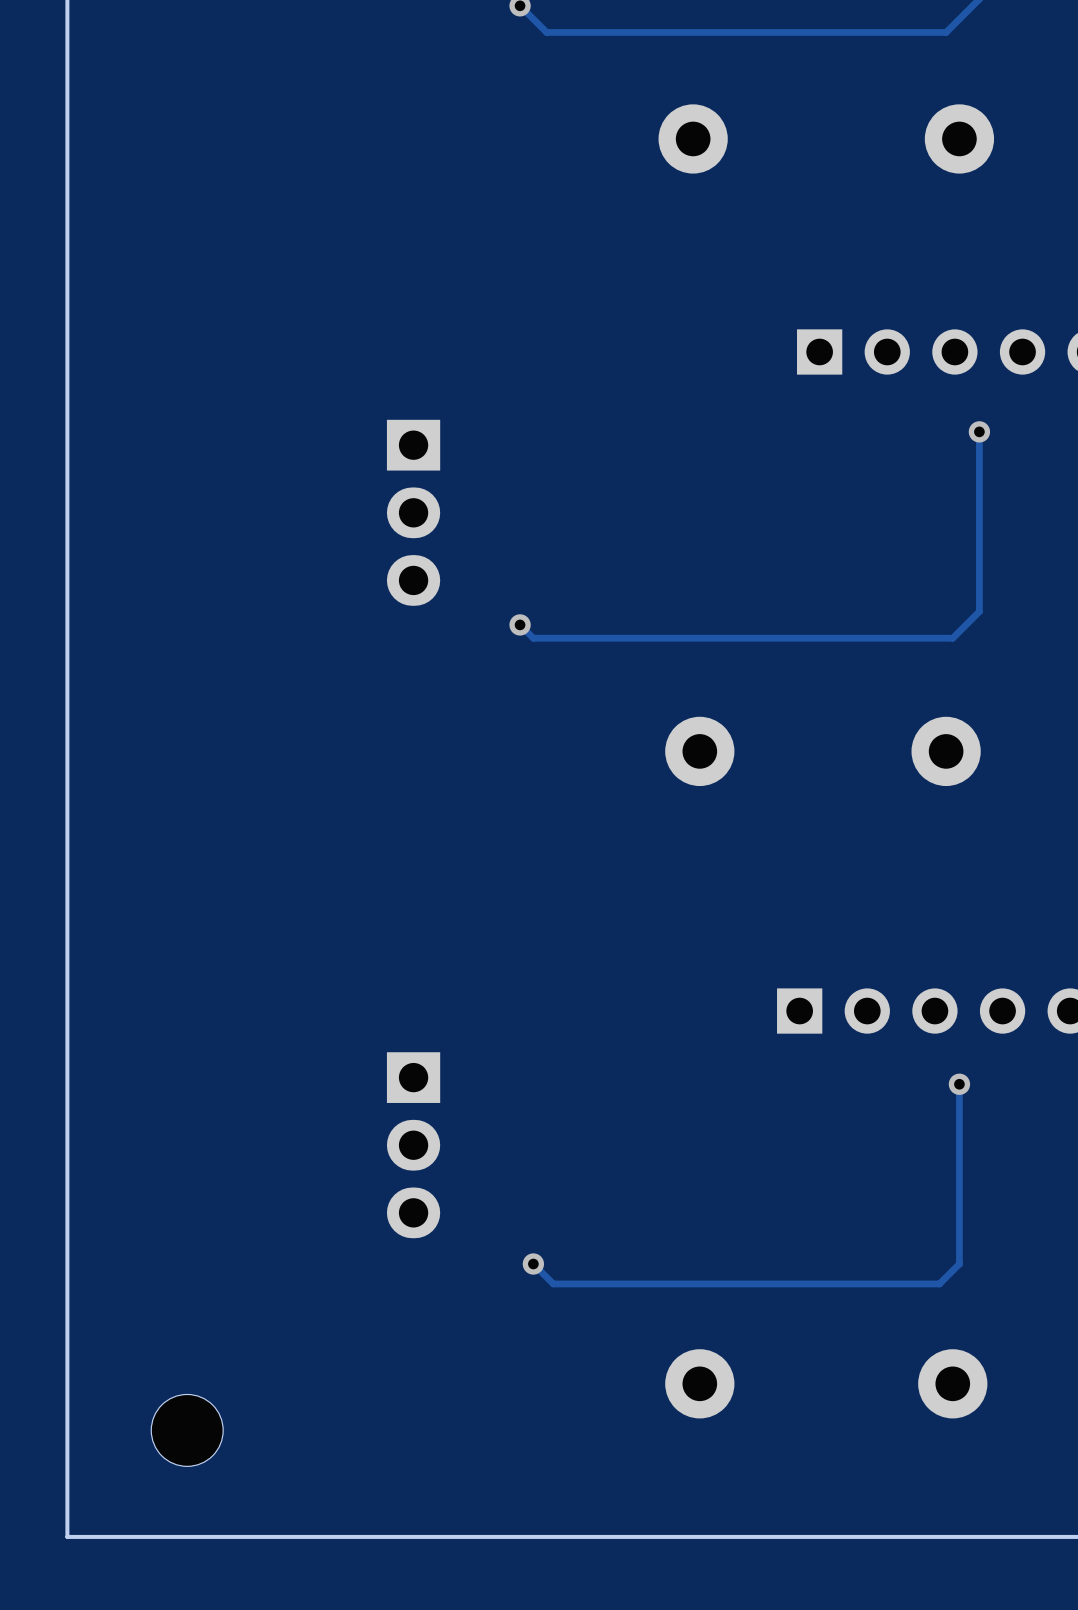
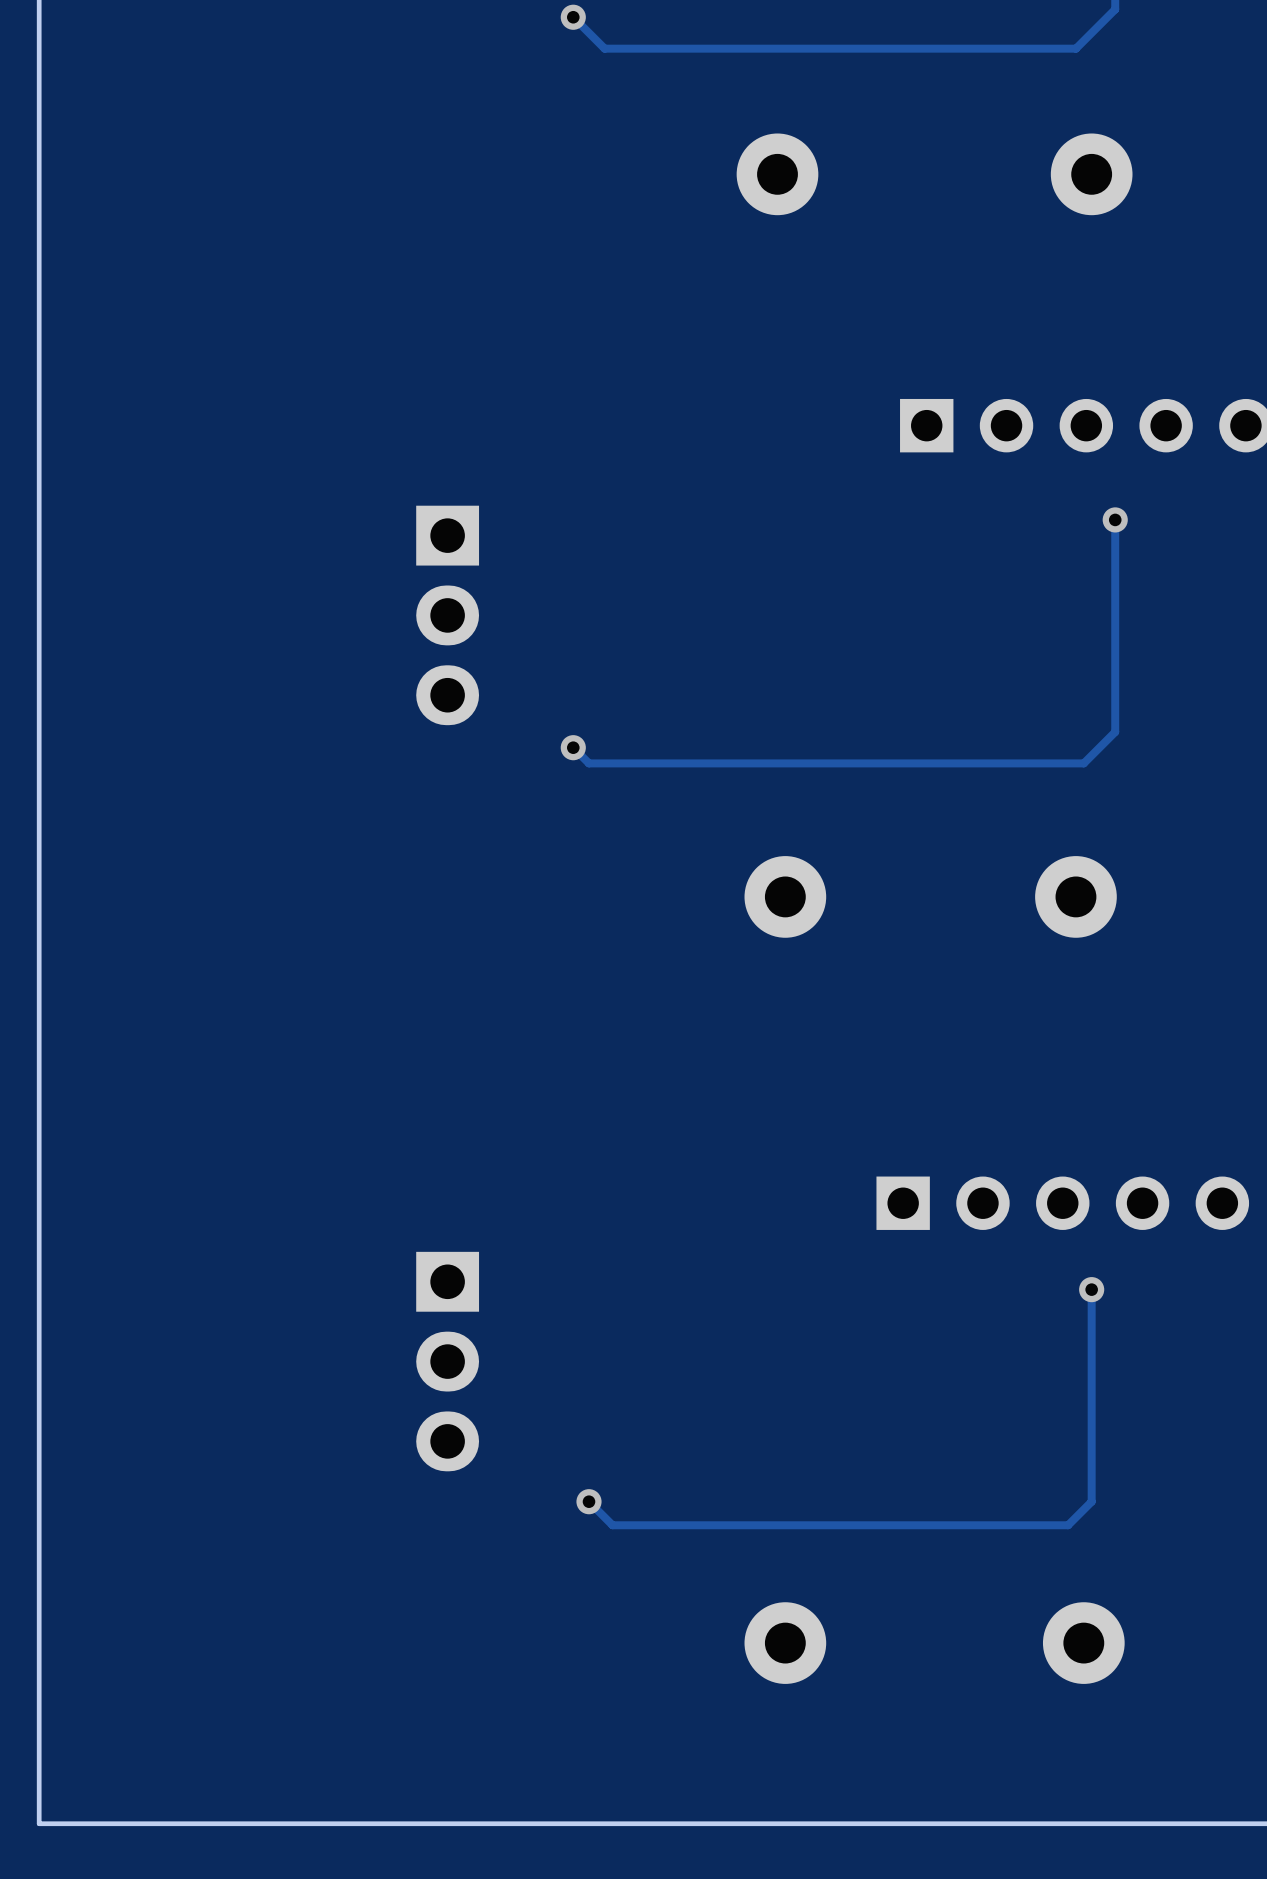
part: (187, 1430) -> none

